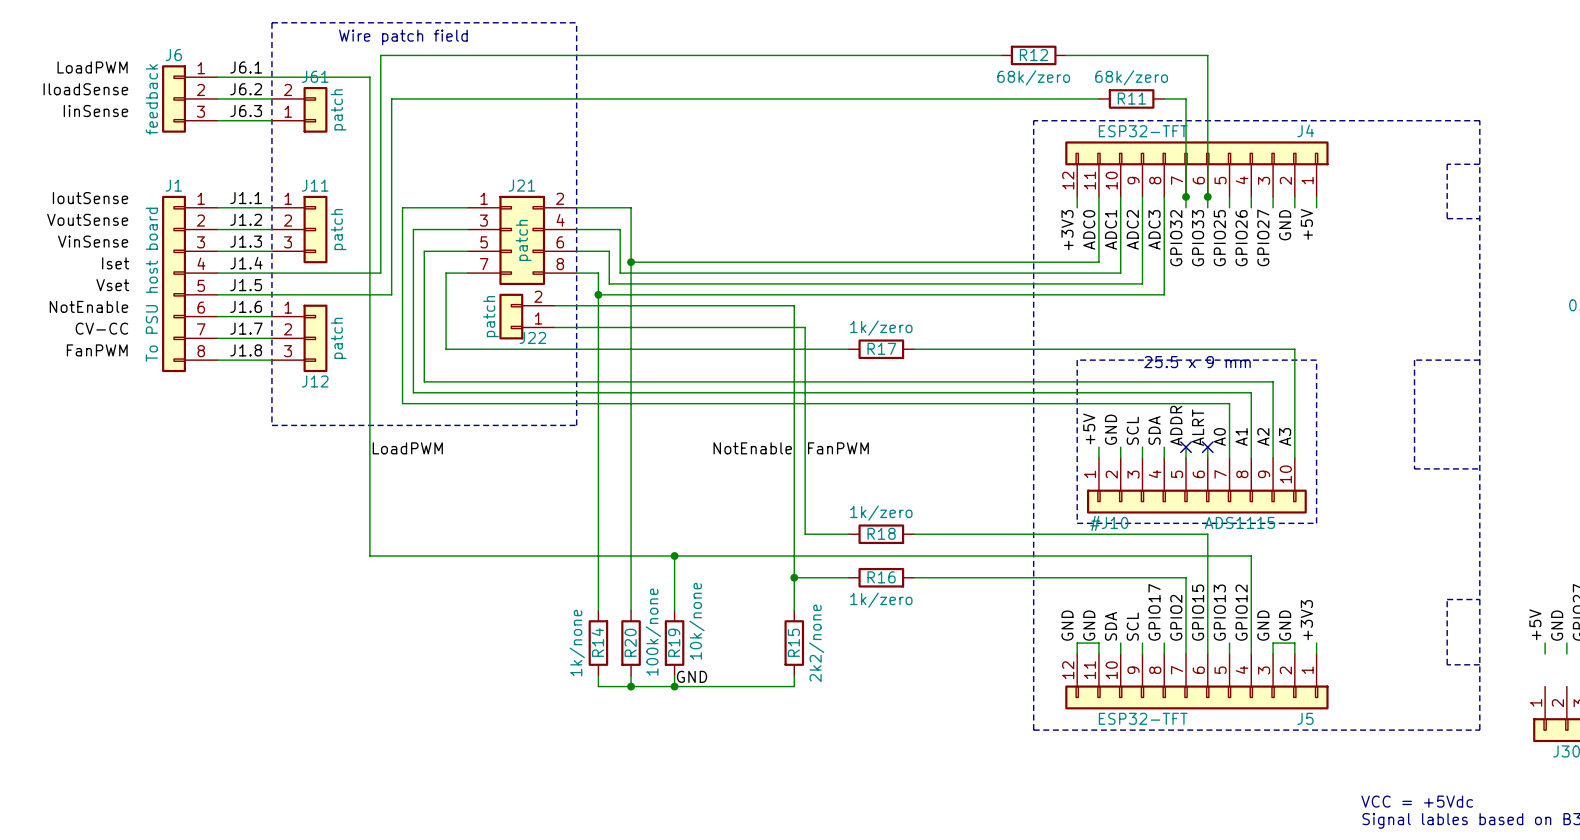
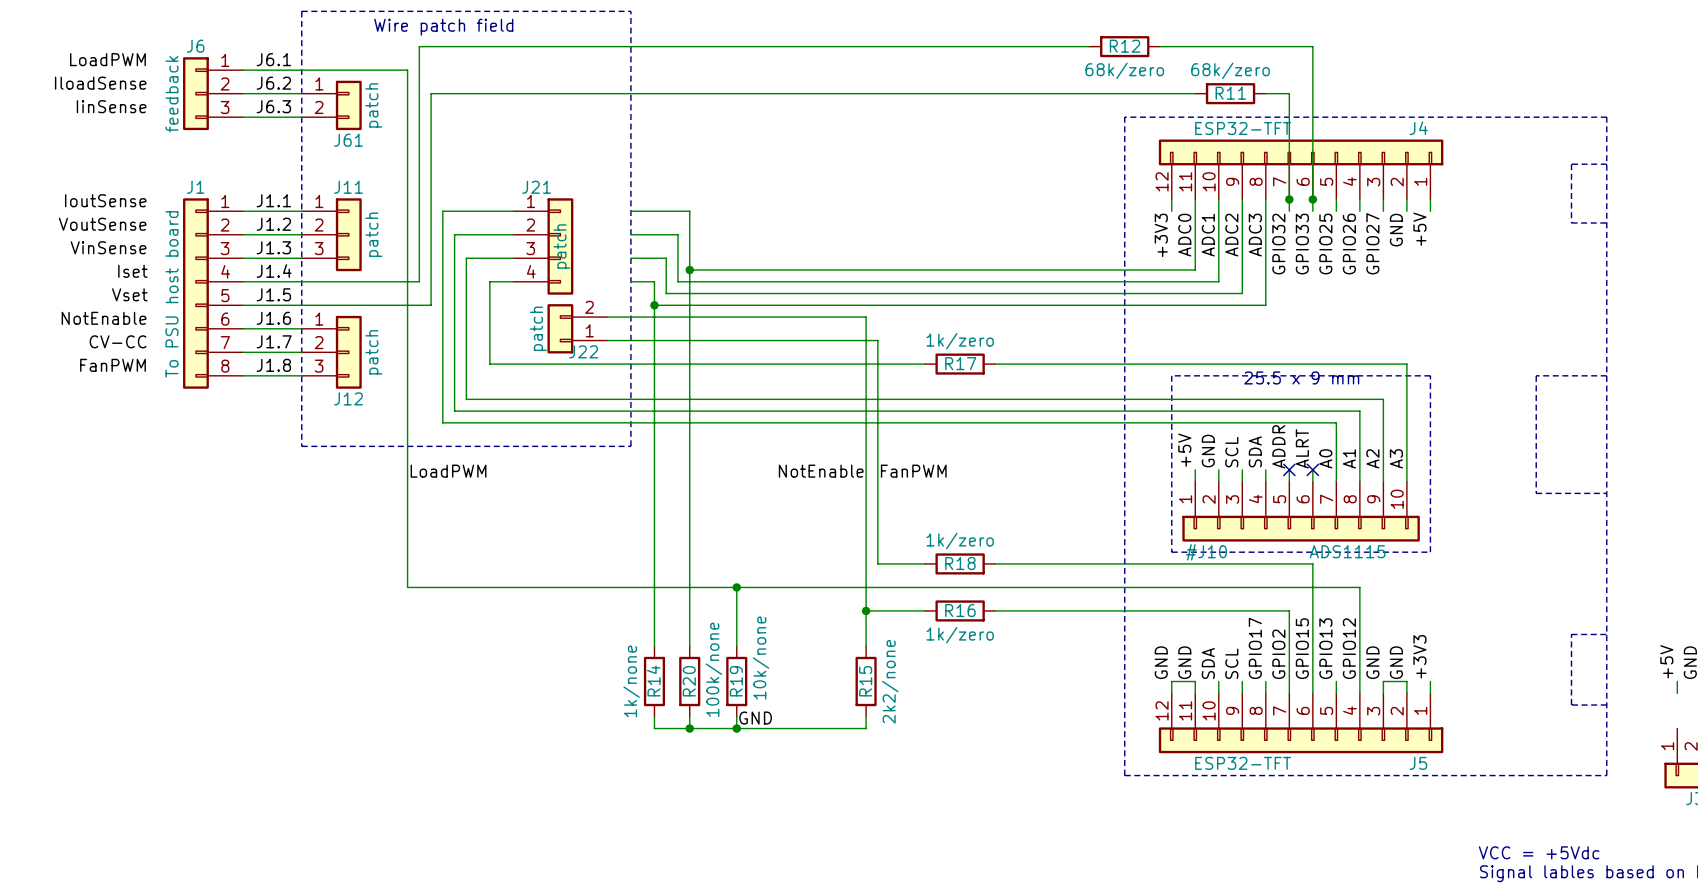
J61 flip: as is (315, 109) -> up-down (348, 105)
J21 symbol: [467, 195, 577, 286] -> [513, 198, 574, 295]

